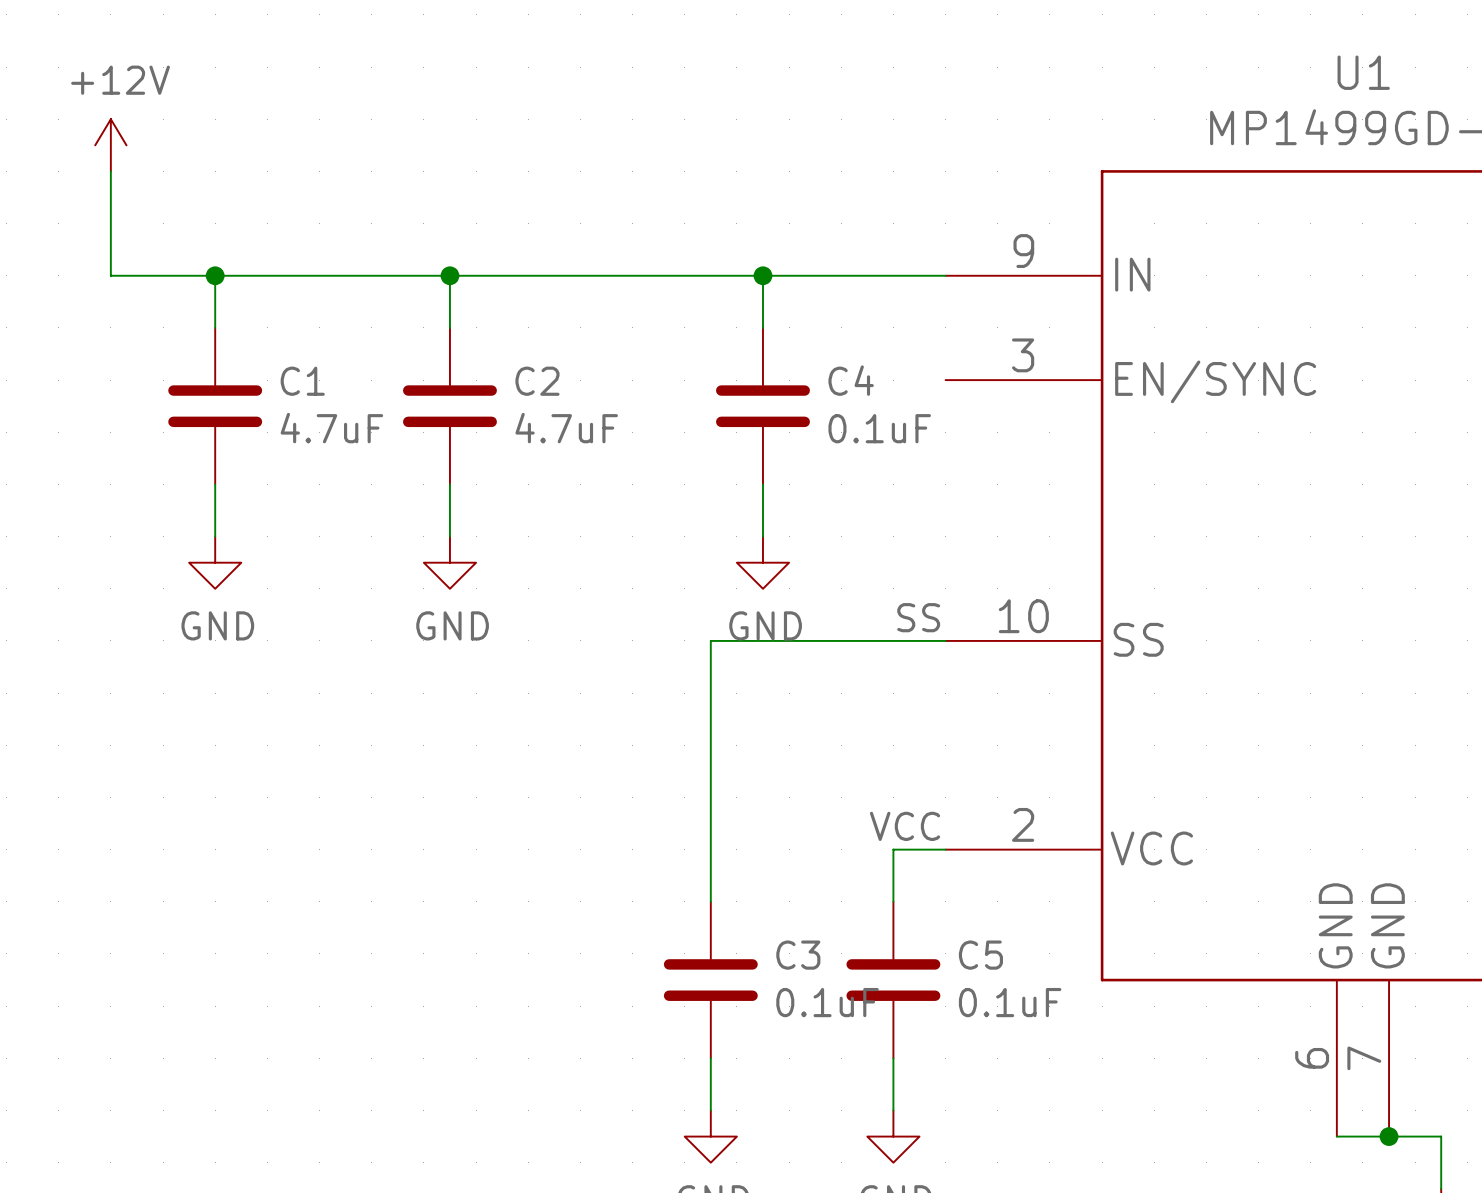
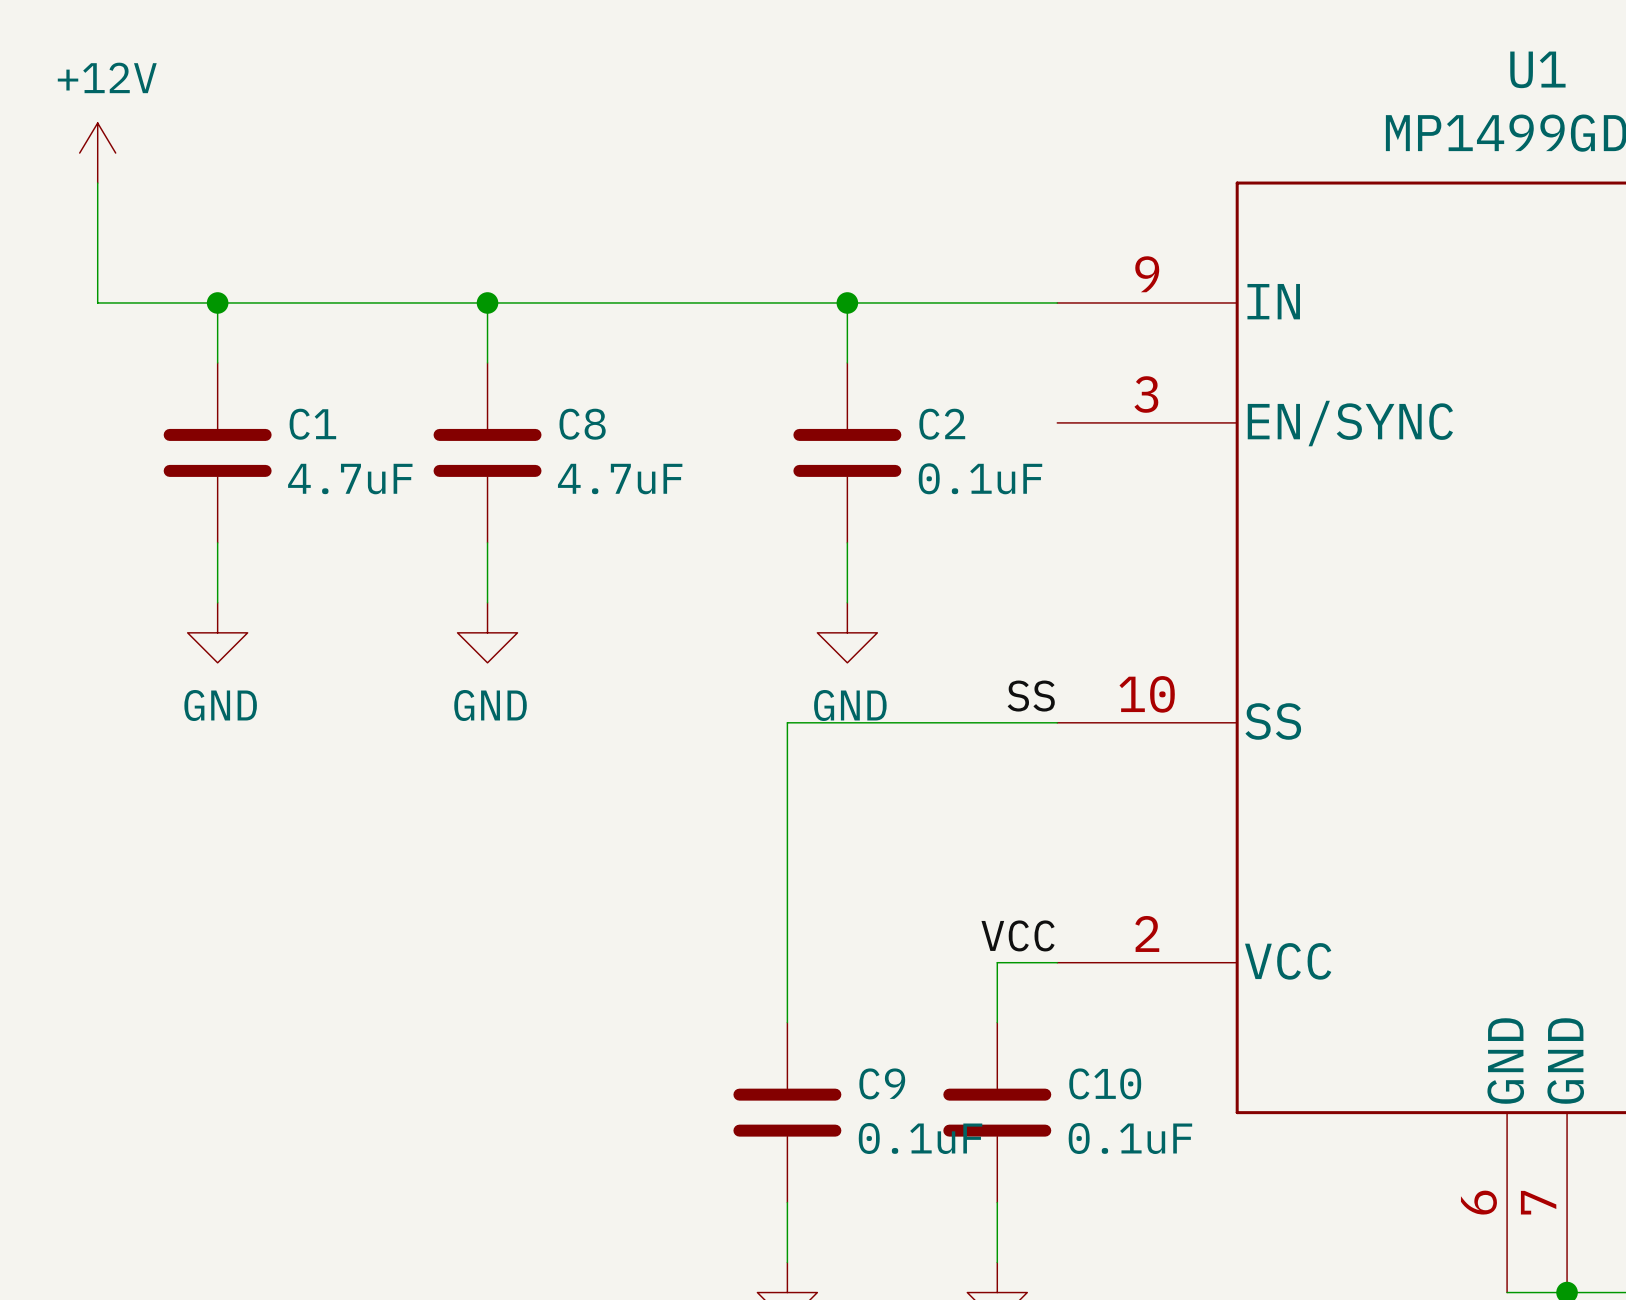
C4 name: C4 (851, 380) -> C2 (942, 424)
C2 name: C2 (537, 381) -> C8 (582, 424)
C3 name: C3 (798, 955) -> C9 (882, 1083)
C5 name: C5 (980, 955) -> C10 (1105, 1083)

